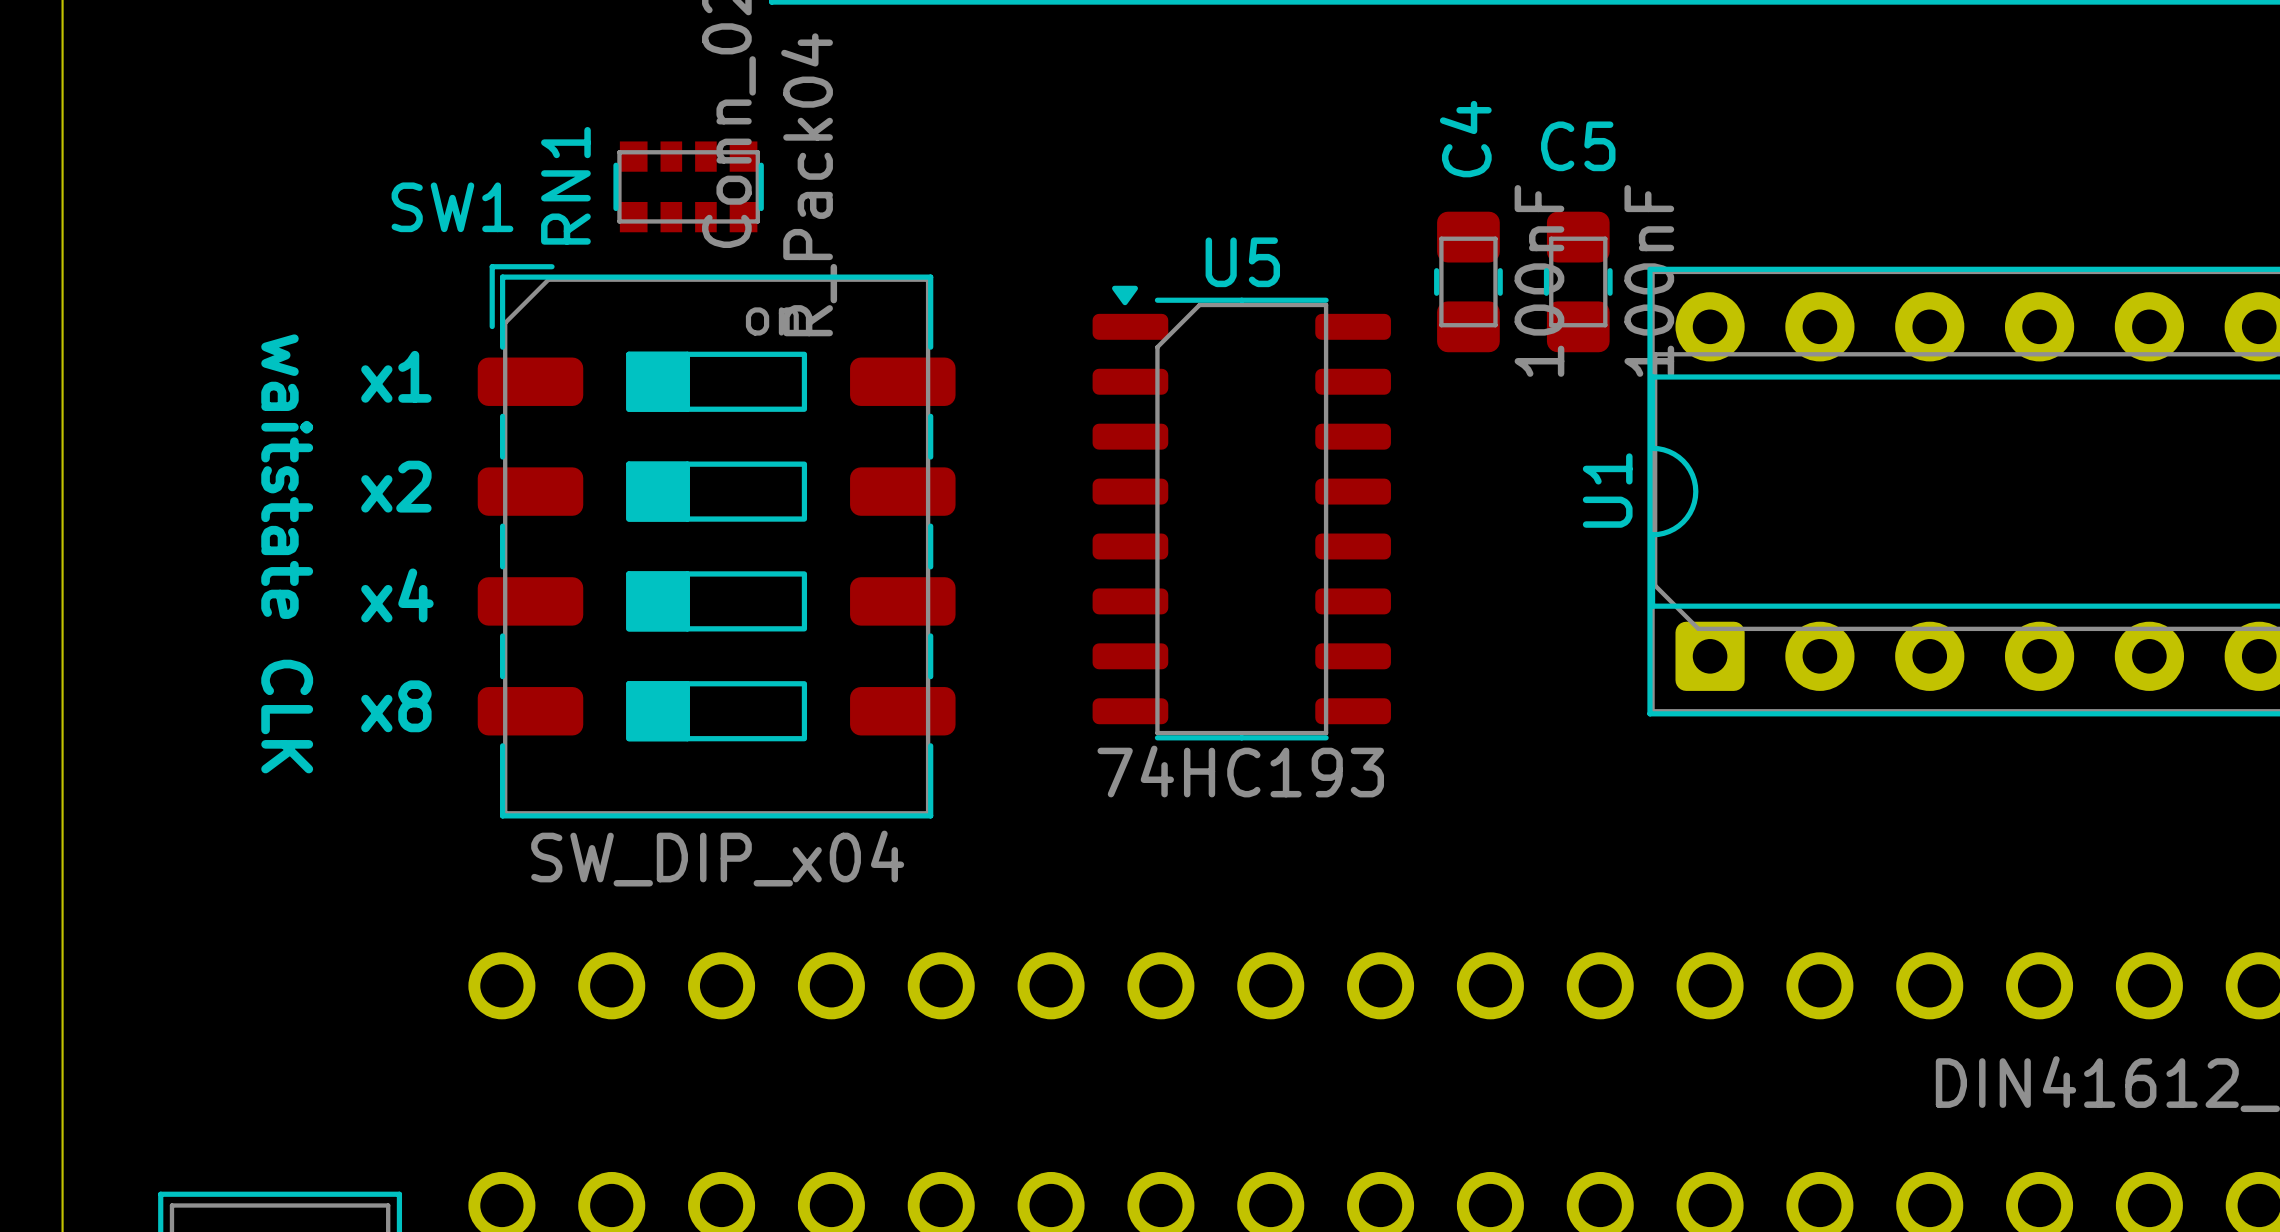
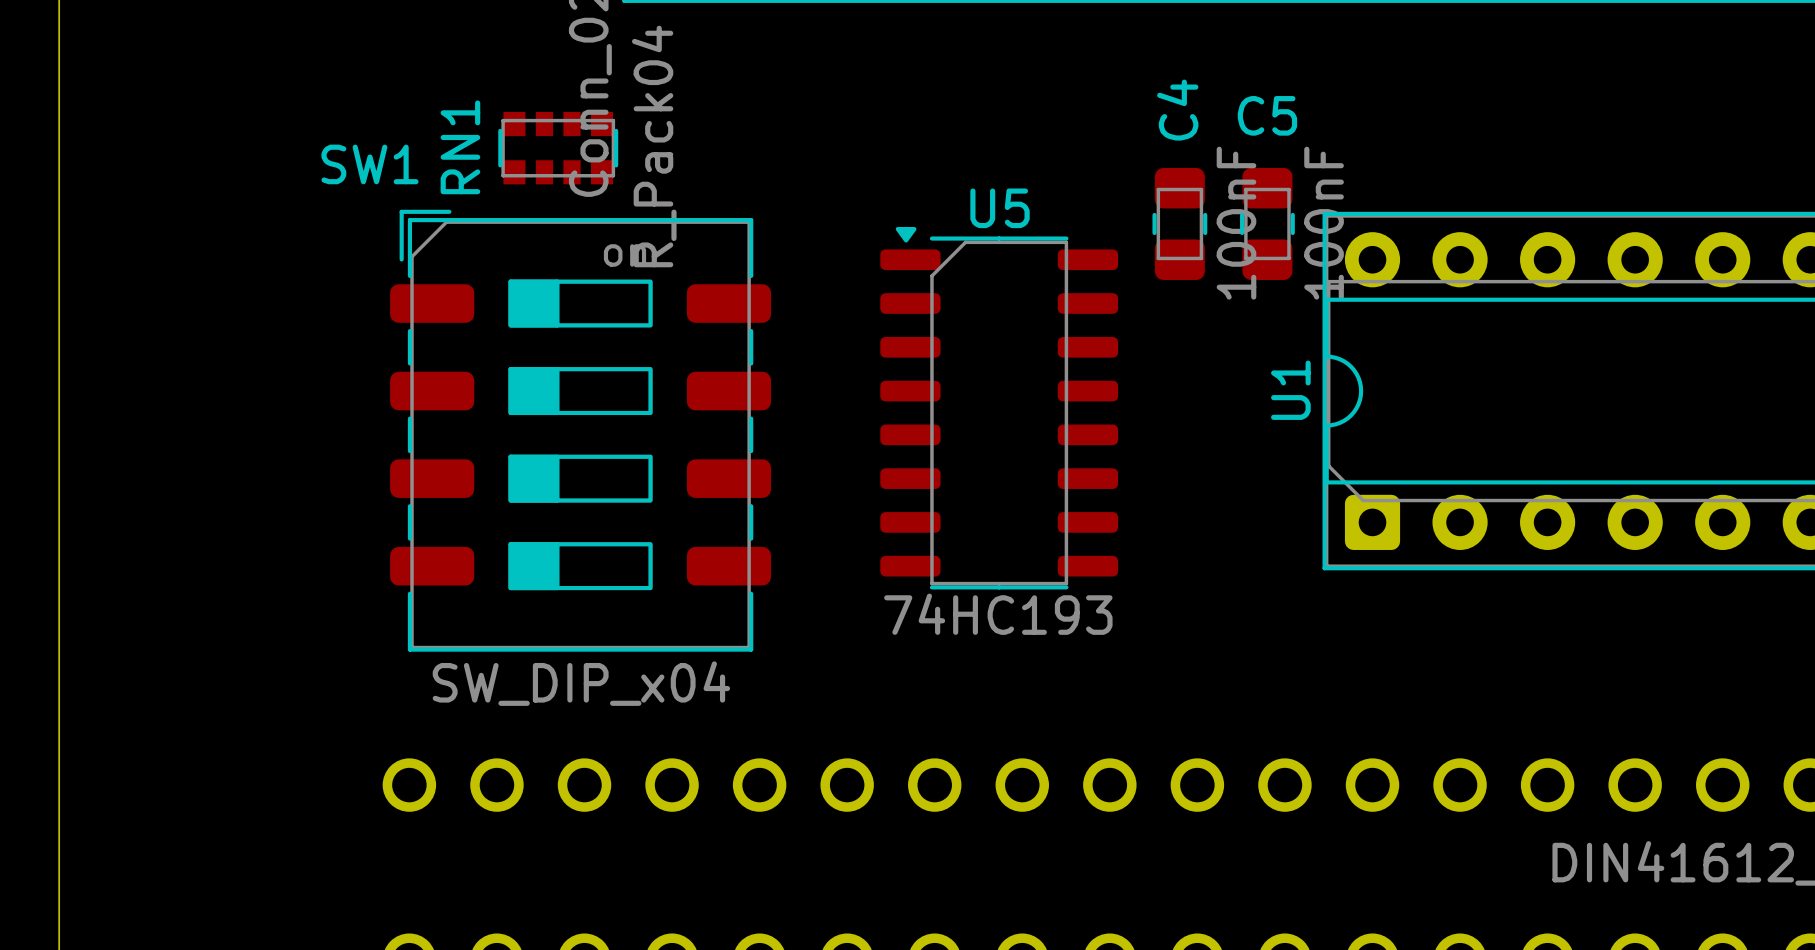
text: x1 (396, 376) -> none
text: x2 (396, 486) -> none
text: waitstate CLK (287, 553) -> none
text: x4 (397, 595) -> none
text: x8 (396, 706) -> none

